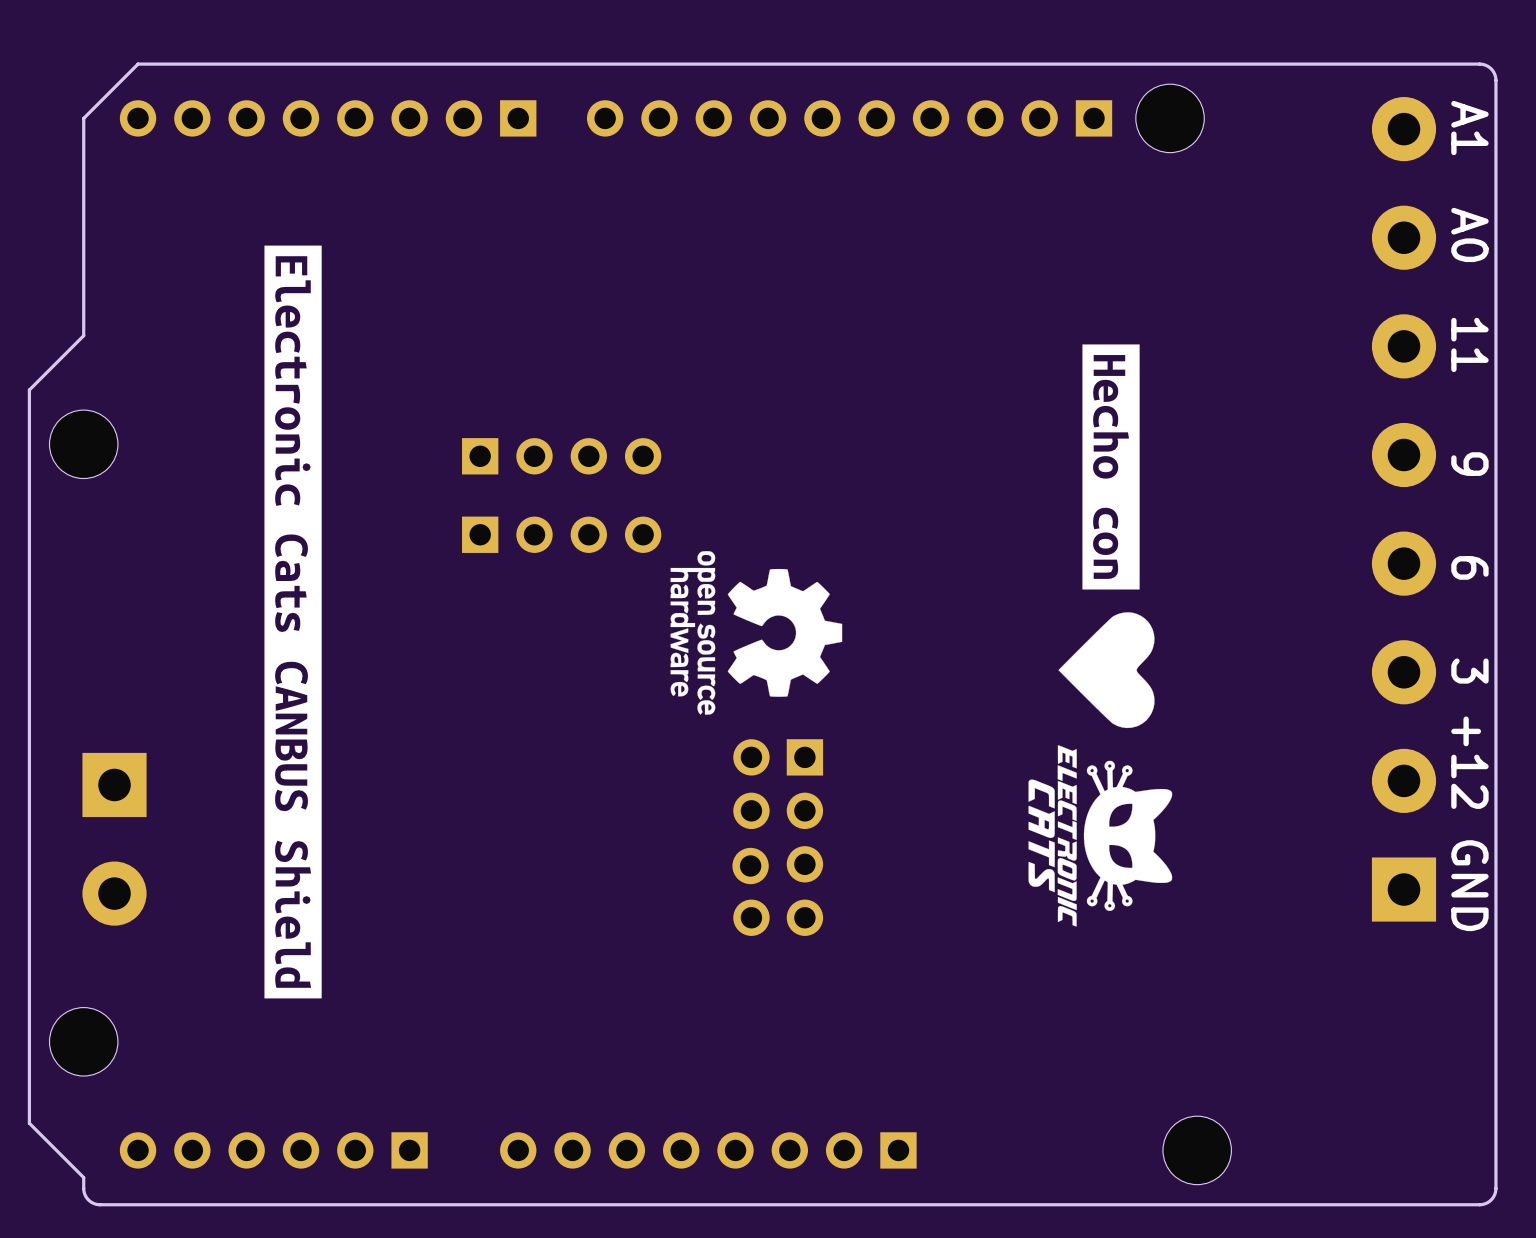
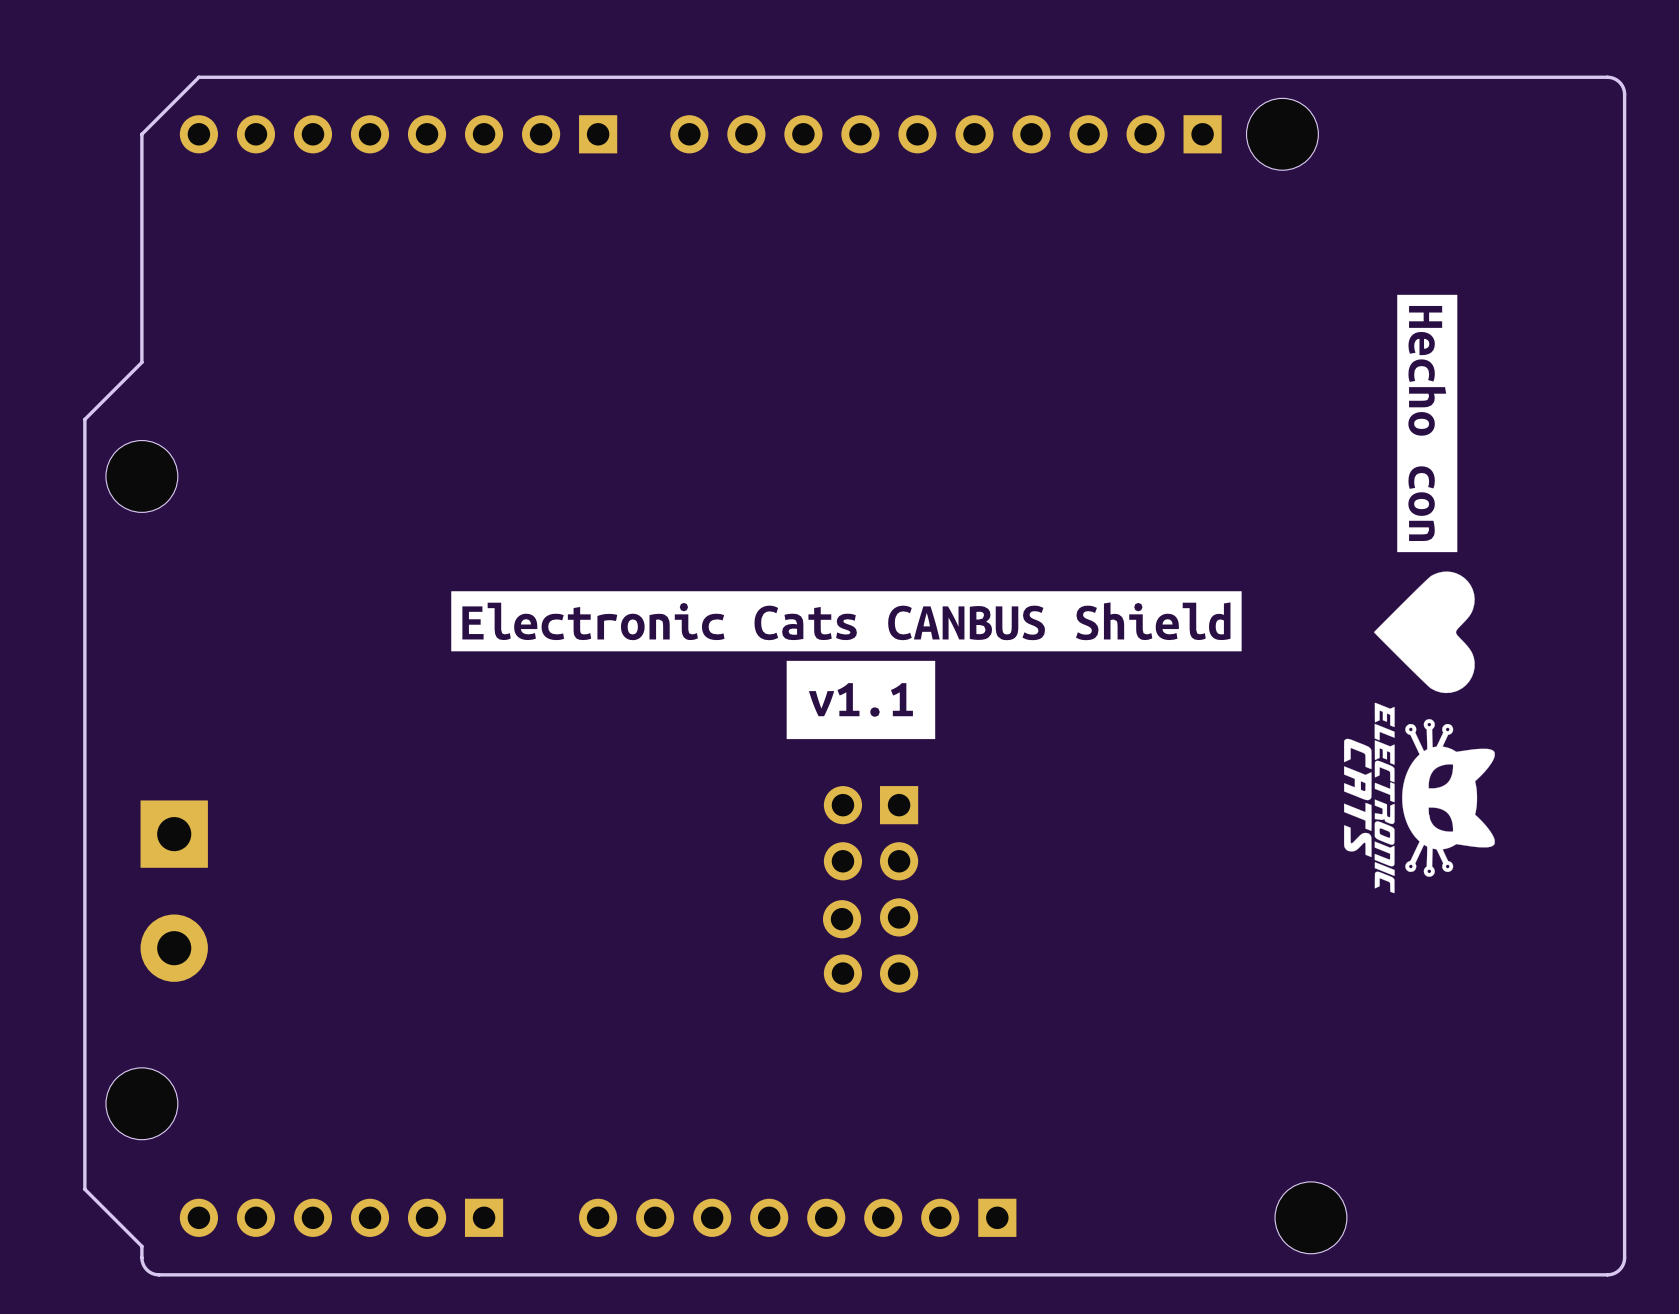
drawing: [264, 245, 322, 999] -> none
part: (561, 456) -> none
drawing position: (1111, 466) -> (1427, 423)
part: (1403, 509) -> none
text: A1 A0 11 9 6 3 +12 GND (1469, 516) -> none
part: (561, 534) -> none
drawing: [670, 551, 843, 715] -> none
drawing: none -> [451, 591, 1242, 740]
drawing position: (1106, 670) -> (1424, 632)
drawing position: (1100, 835) -> (1419, 797)

